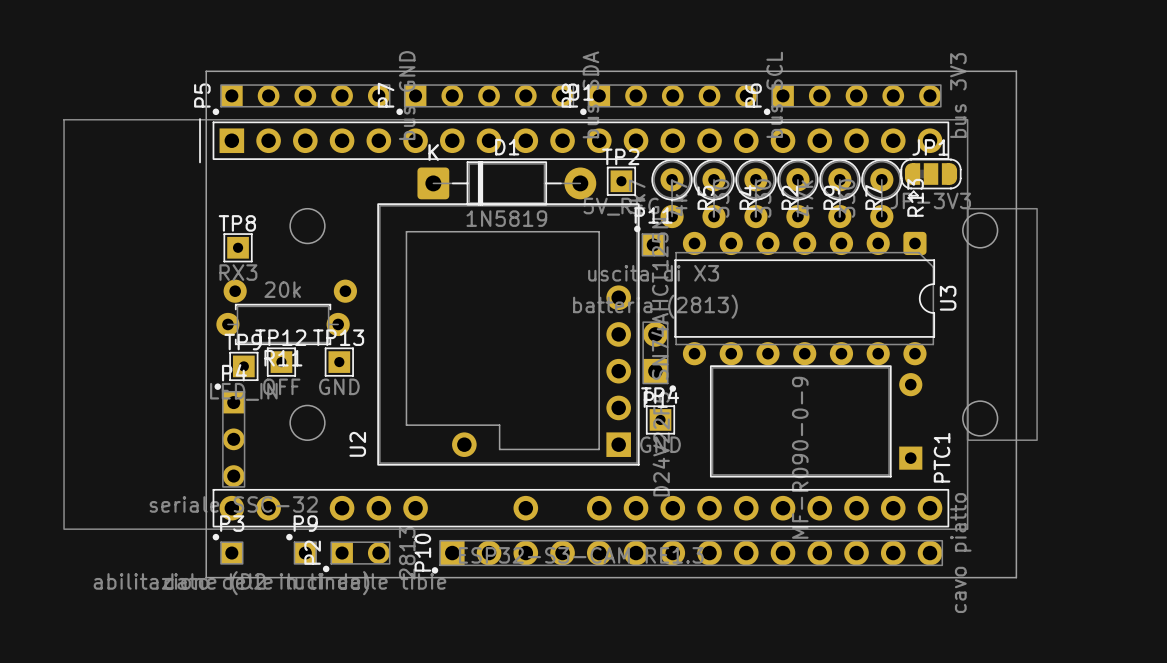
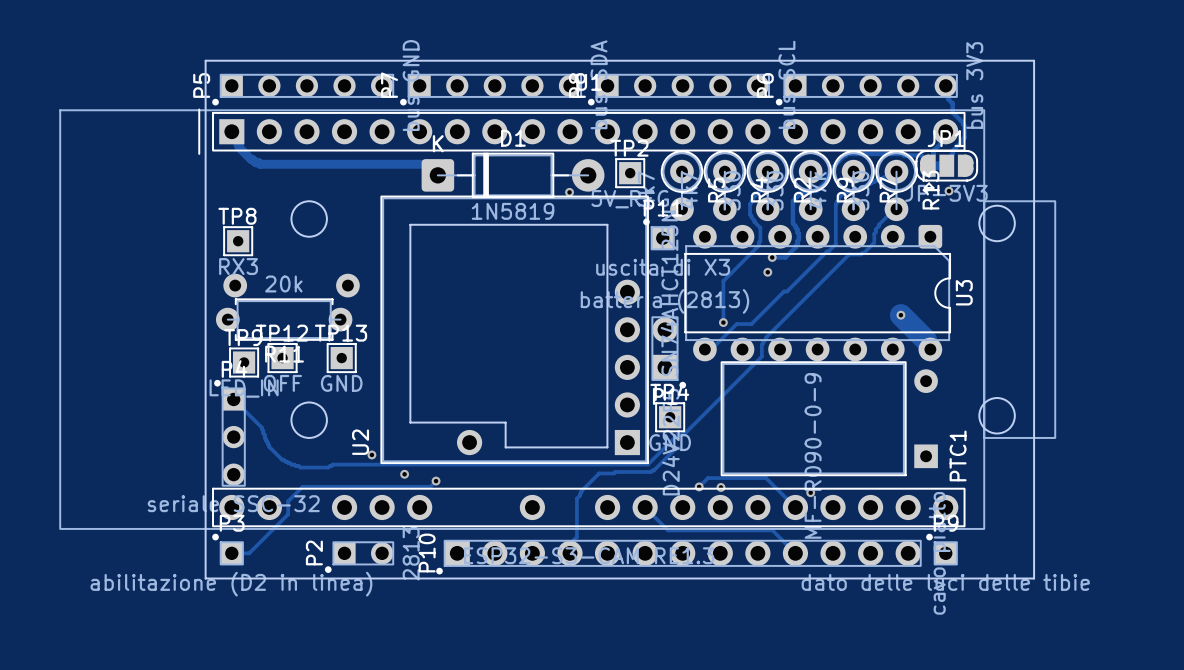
track: none -> (948, 94) (948, 99) (952, 103) (952, 112) (964, 125) (964, 137) (951, 155)
track: none -> (942, 142) (933, 150) (933, 155)
track: none -> (238, 143) (239, 148) (251, 159) (260, 164) (421, 164)
track: none -> (921, 155) (844, 155) (829, 170) (826, 180) (816, 190) (806, 190) (792, 201) (792, 223) (798, 233) (797, 244) (785, 257) (772, 257)
track: none -> (887, 176) (859, 189) (843, 193) (835, 204) (835, 244) (751, 324) (736, 324) (714, 346)
track: none -> (763, 180) (758, 192) (750, 204) (750, 214) (760, 227) (760, 241) (758, 245) (723, 281) (723, 322)
via: none -> (949, 191)
via: none -> (569, 192)
track: none -> (889, 214) (875, 229) (874, 242) (860, 254) (849, 254) (766, 337) (761, 344) (761, 356) (684, 433) (677, 435) (647, 464) (332, 464) (328, 467) (300, 467) (282, 460) (269, 446) (261, 427) (244, 409)
via: none -> (772, 257)
via: none -> (767, 272)
track: none -> (900, 315) (926, 340)
via: none -> (900, 315)
via: none -> (723, 322)
track: none -> (679, 448) (676, 448) (650, 471) (599, 473) (581, 491) (576, 498) (576, 537) (572, 542)
via: none -> (371, 454)
via: none -> (404, 474)
track: none -> (436, 481) (430, 486) (302, 486) (288, 501) (288, 514) (249, 553) (231, 553)
via: none -> (436, 481)
track: none -> (699, 486) (708, 478) (766, 478) (795, 507)
via: none -> (699, 486)
via: none -> (720, 487)
via: none -> (810, 492)
track: none -> (645, 507) (668, 530) (772, 530) (795, 553)
P10 footprint: [431, 540, 944, 574] -> [436, 540, 922, 575]
P9 position: (301, 549) -> (941, 549)

